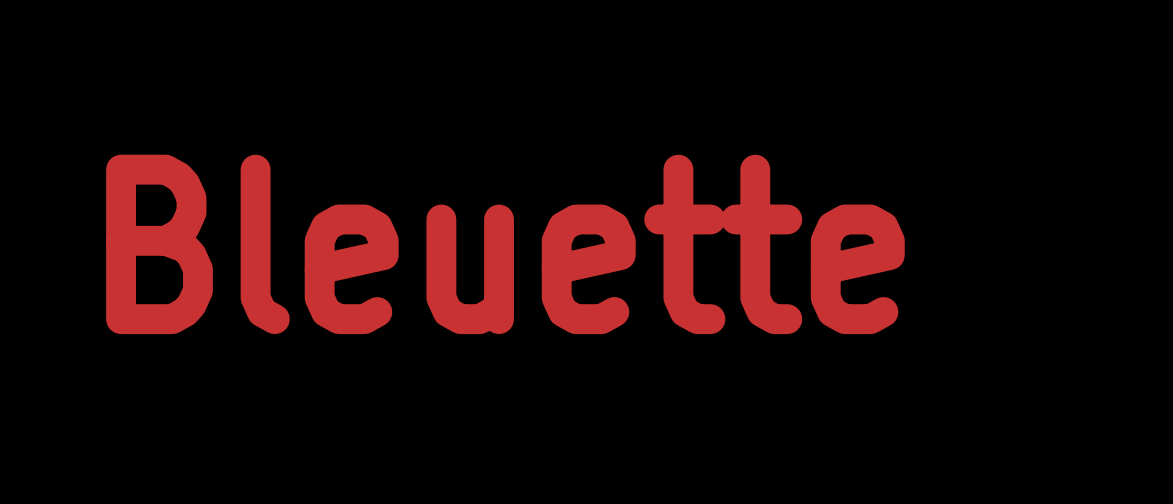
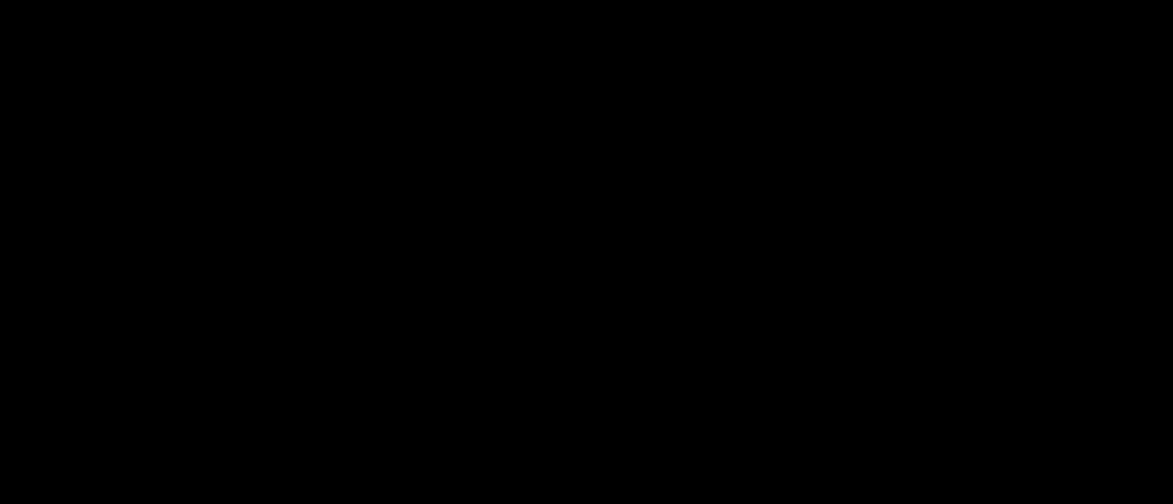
text: Bleuette (505, 244) -> none

